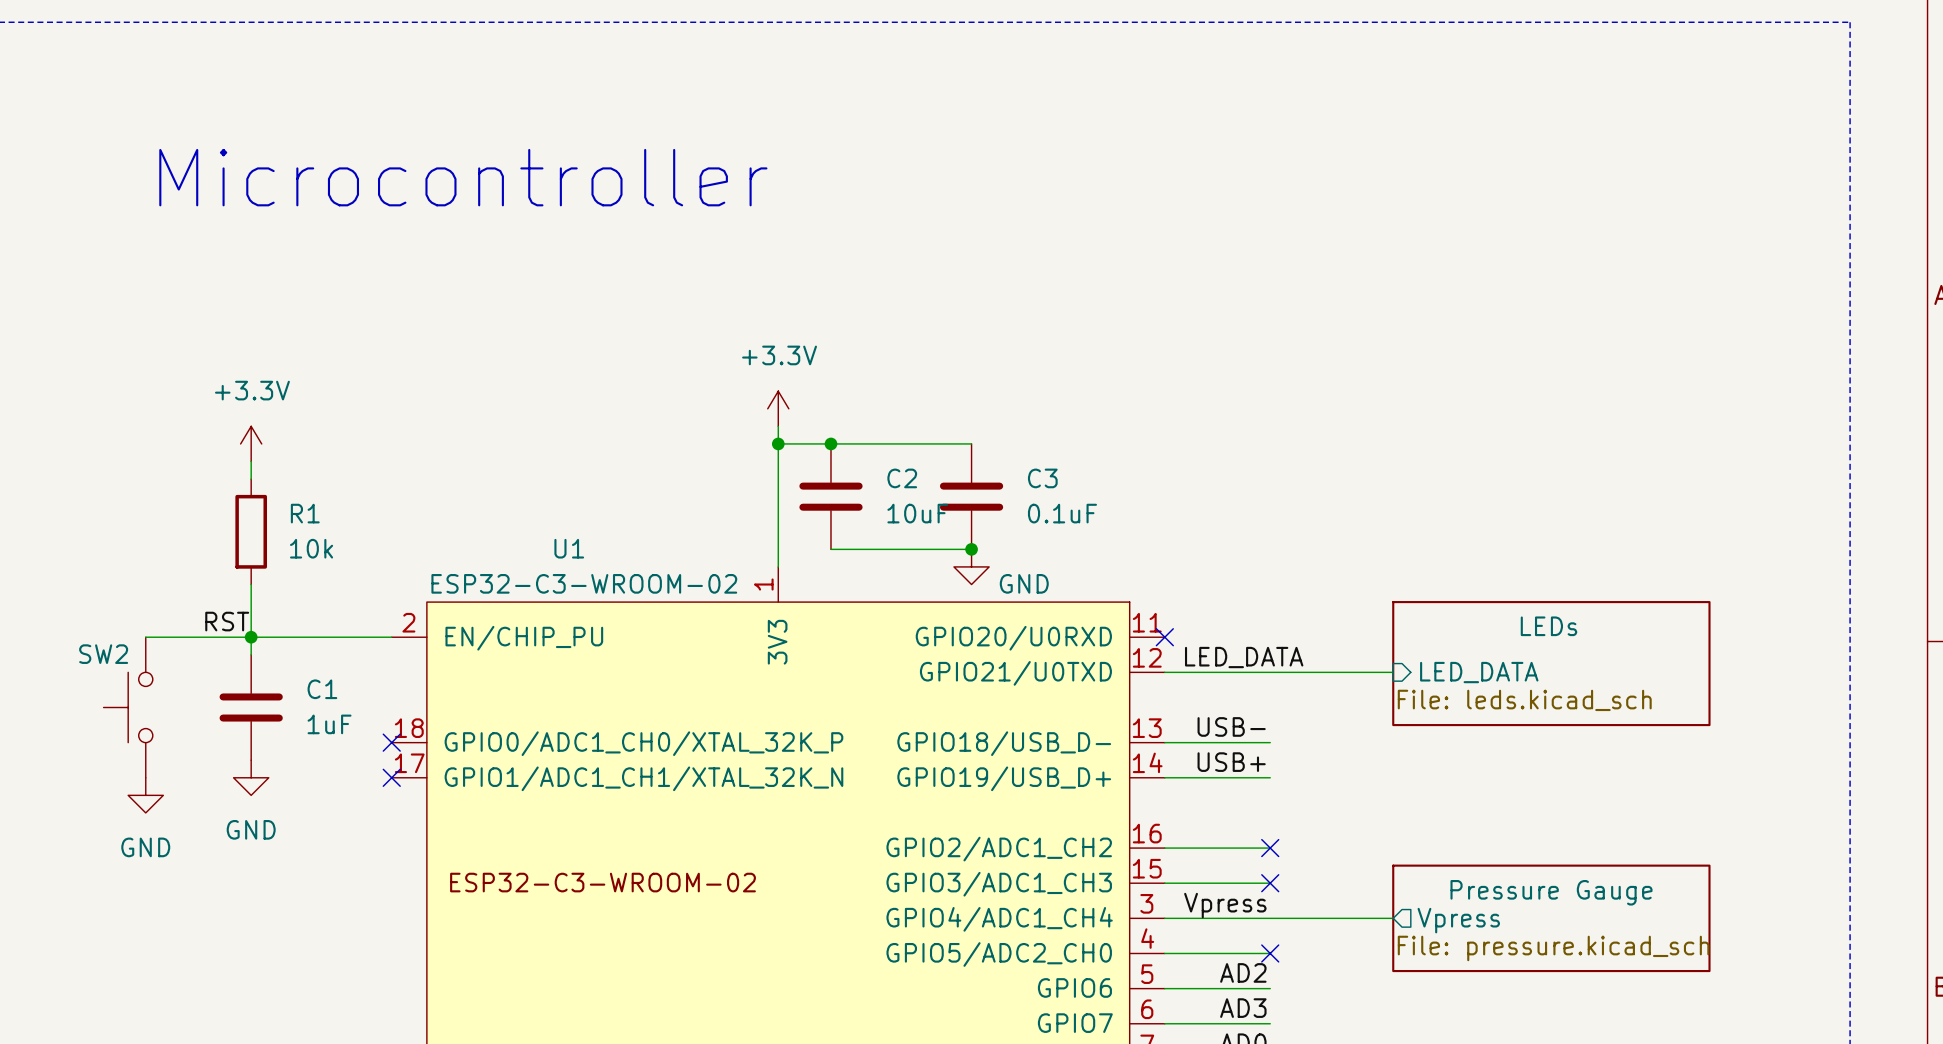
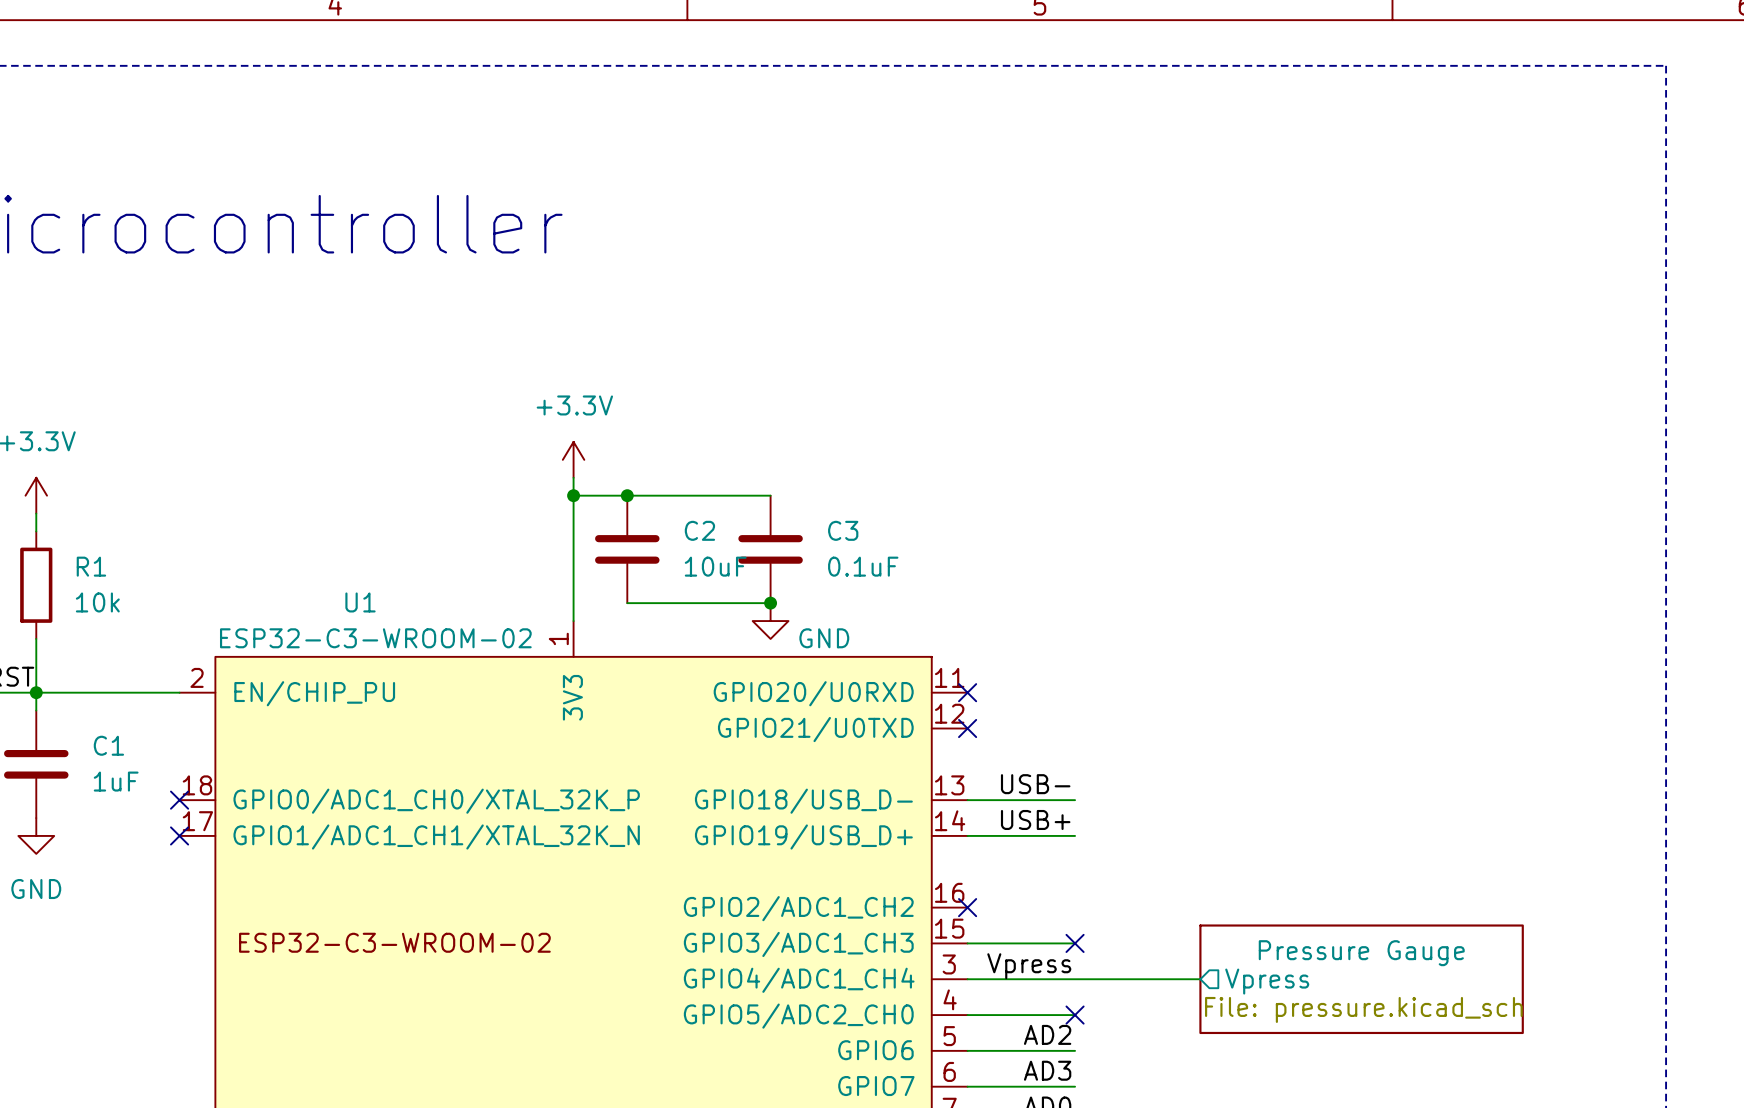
label: LED_DATA (1244, 657) -> none
sheet LEDs: File: leds.kicad_sch (1551, 663) -> none
wire: (1164, 672) (1393, 672) -> none
no-connect mark: none -> (967, 728)
sheet pin: LED_DATA (1479, 672) -> none
wire: (1164, 848) (1270, 848) -> none
no-connect mark: none -> (967, 907)
no-connect mark: (1270, 848) -> none

